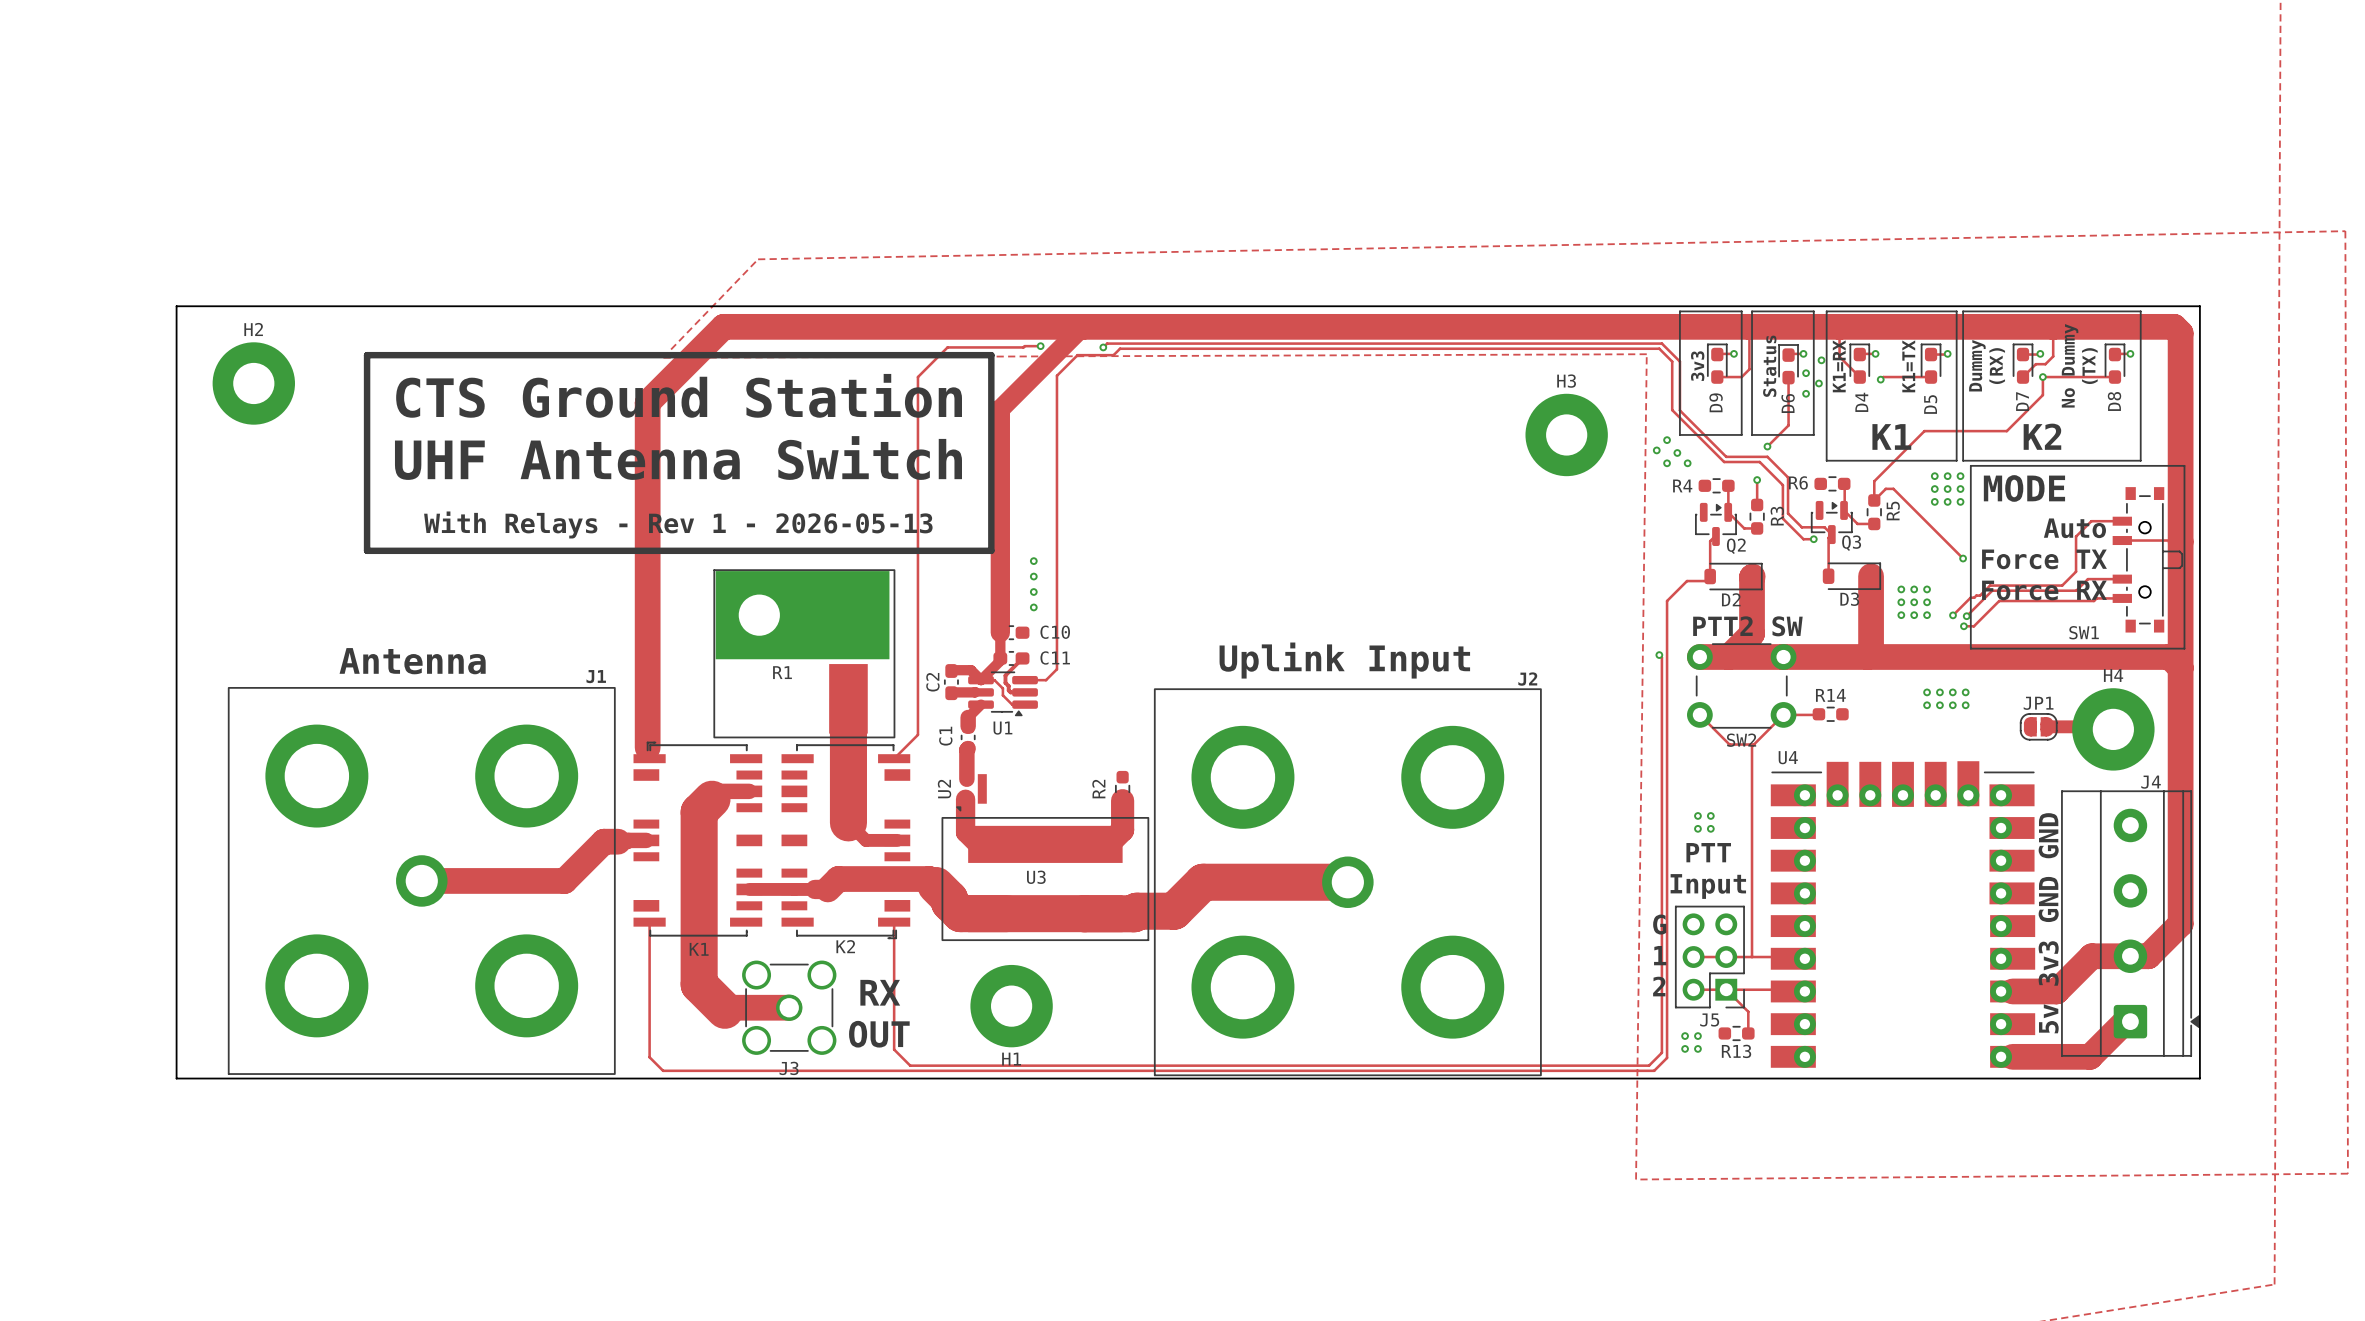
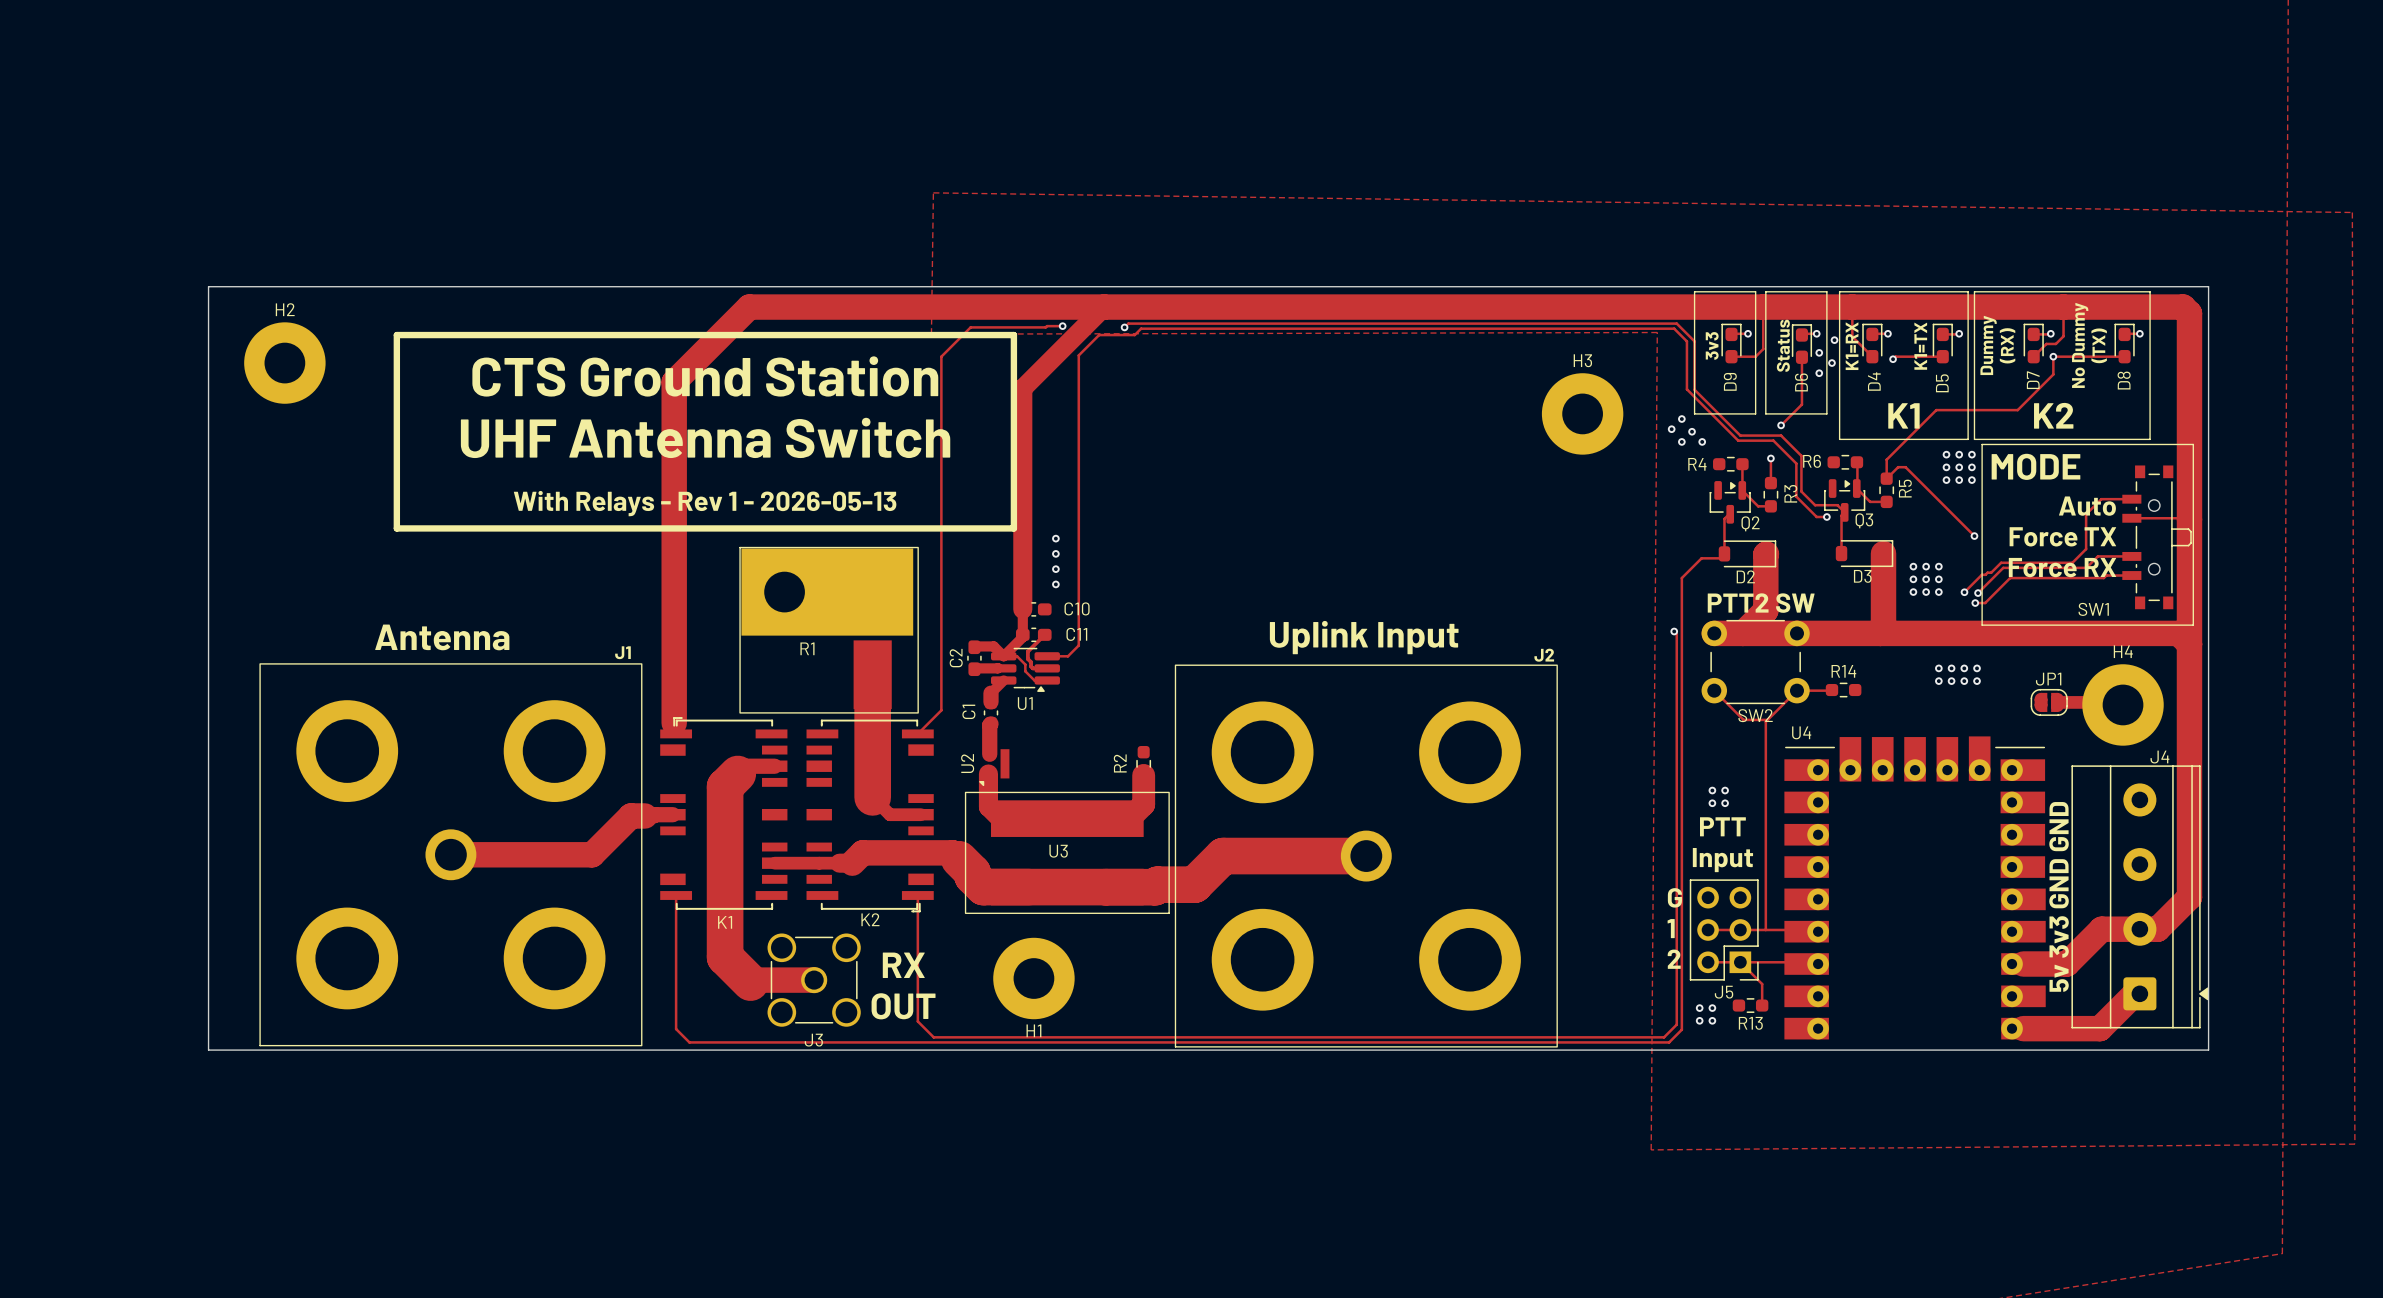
zone outline: (2345, 231) (758, 259) (663, 357) (1646, 354) (1636, 1179) -> (2352, 212) (933, 192) (931, 334) (1657, 332) (1651, 1149)

